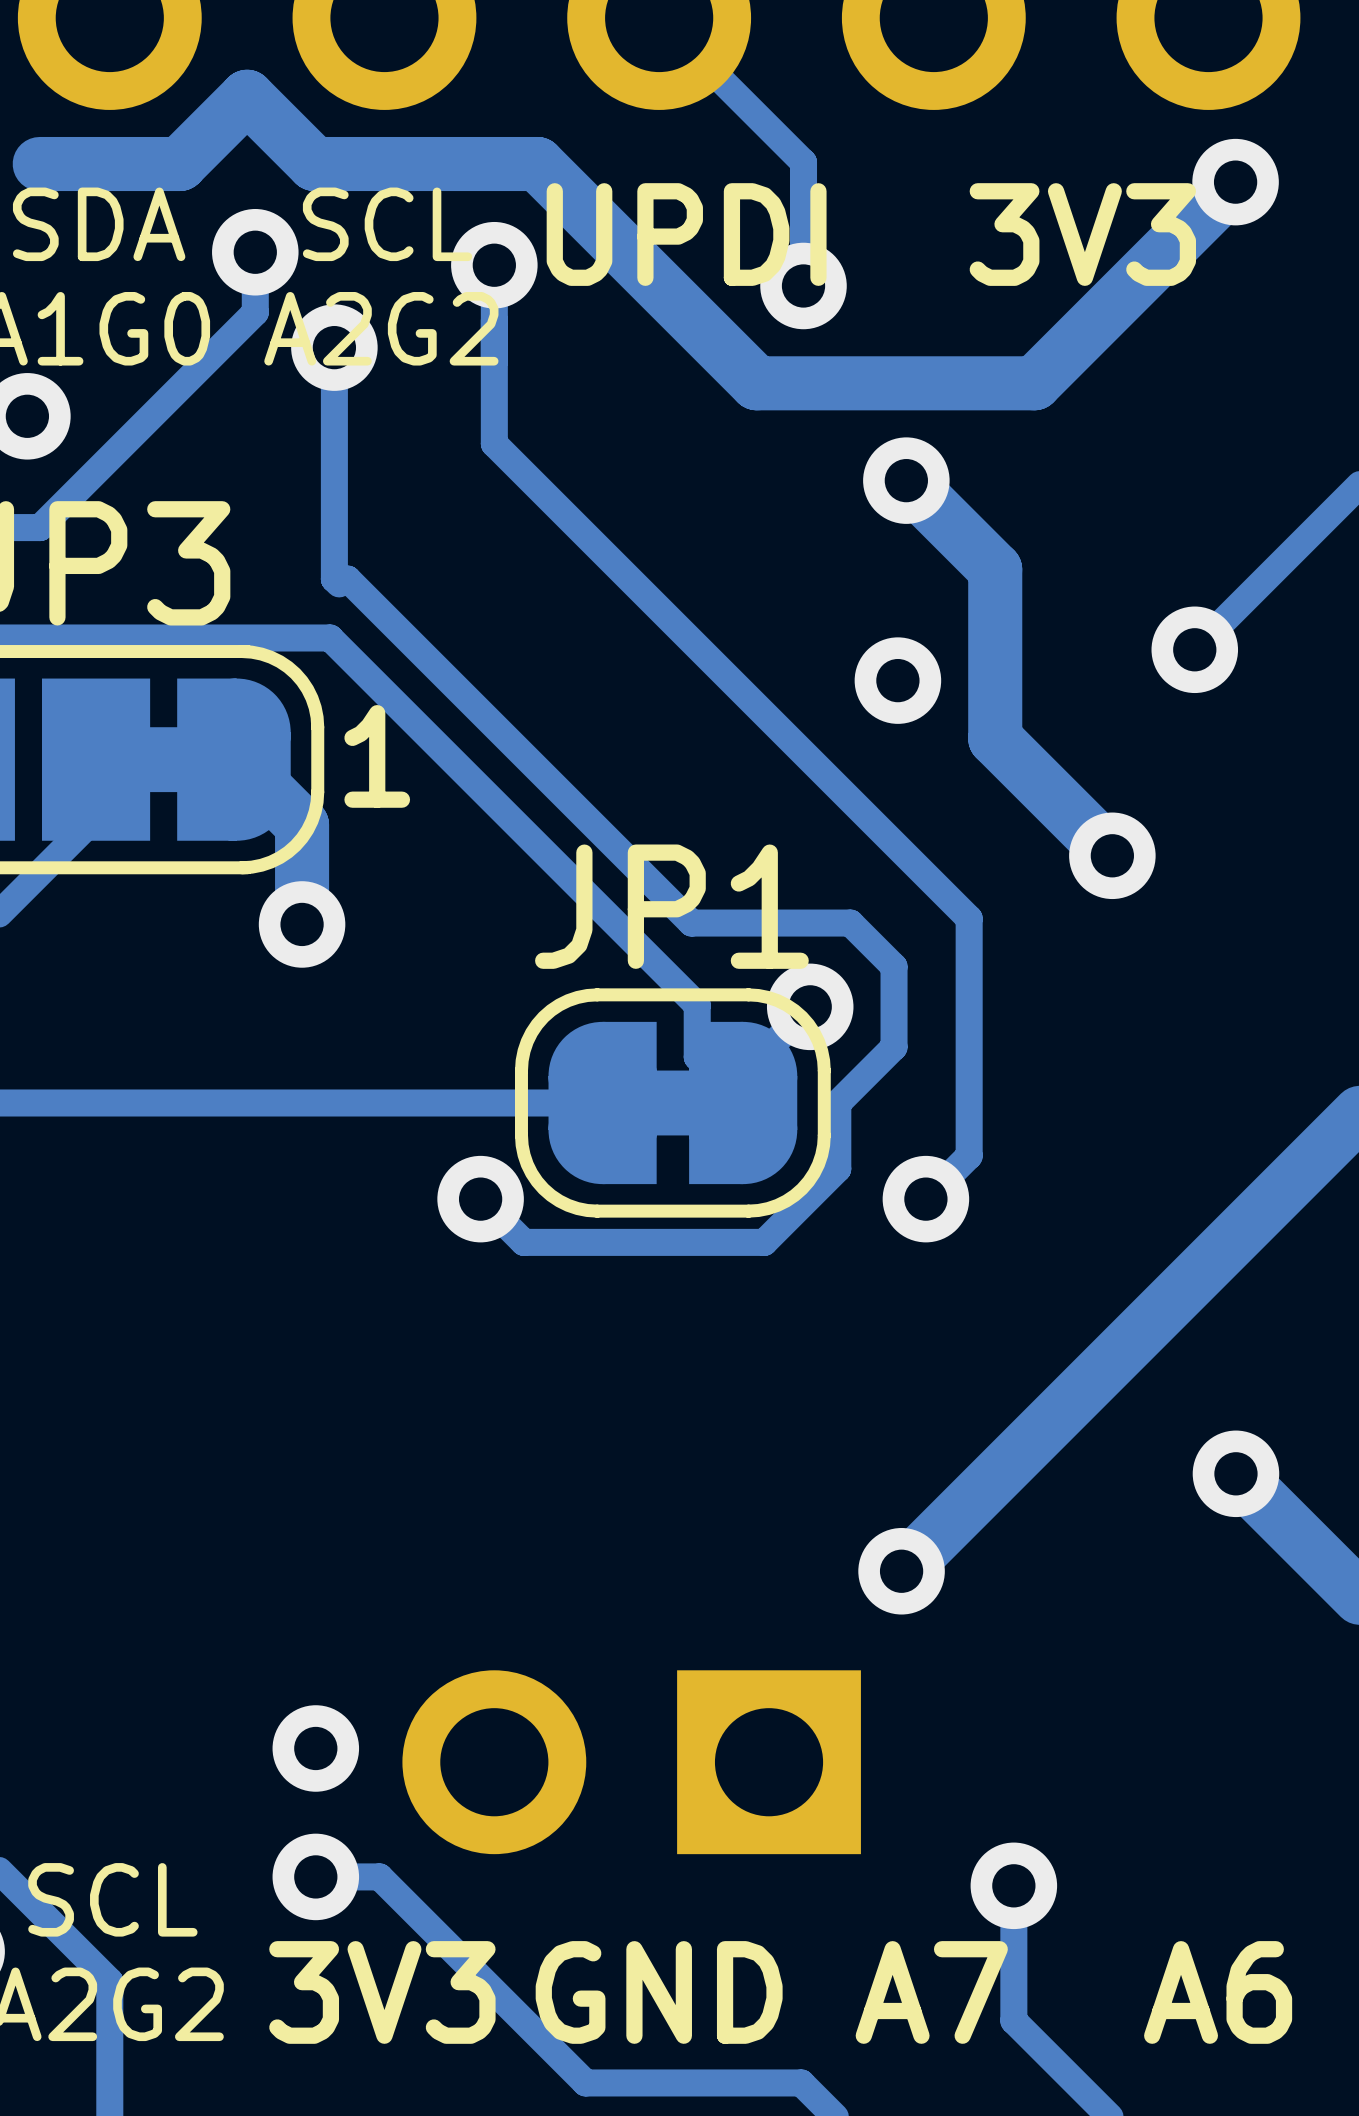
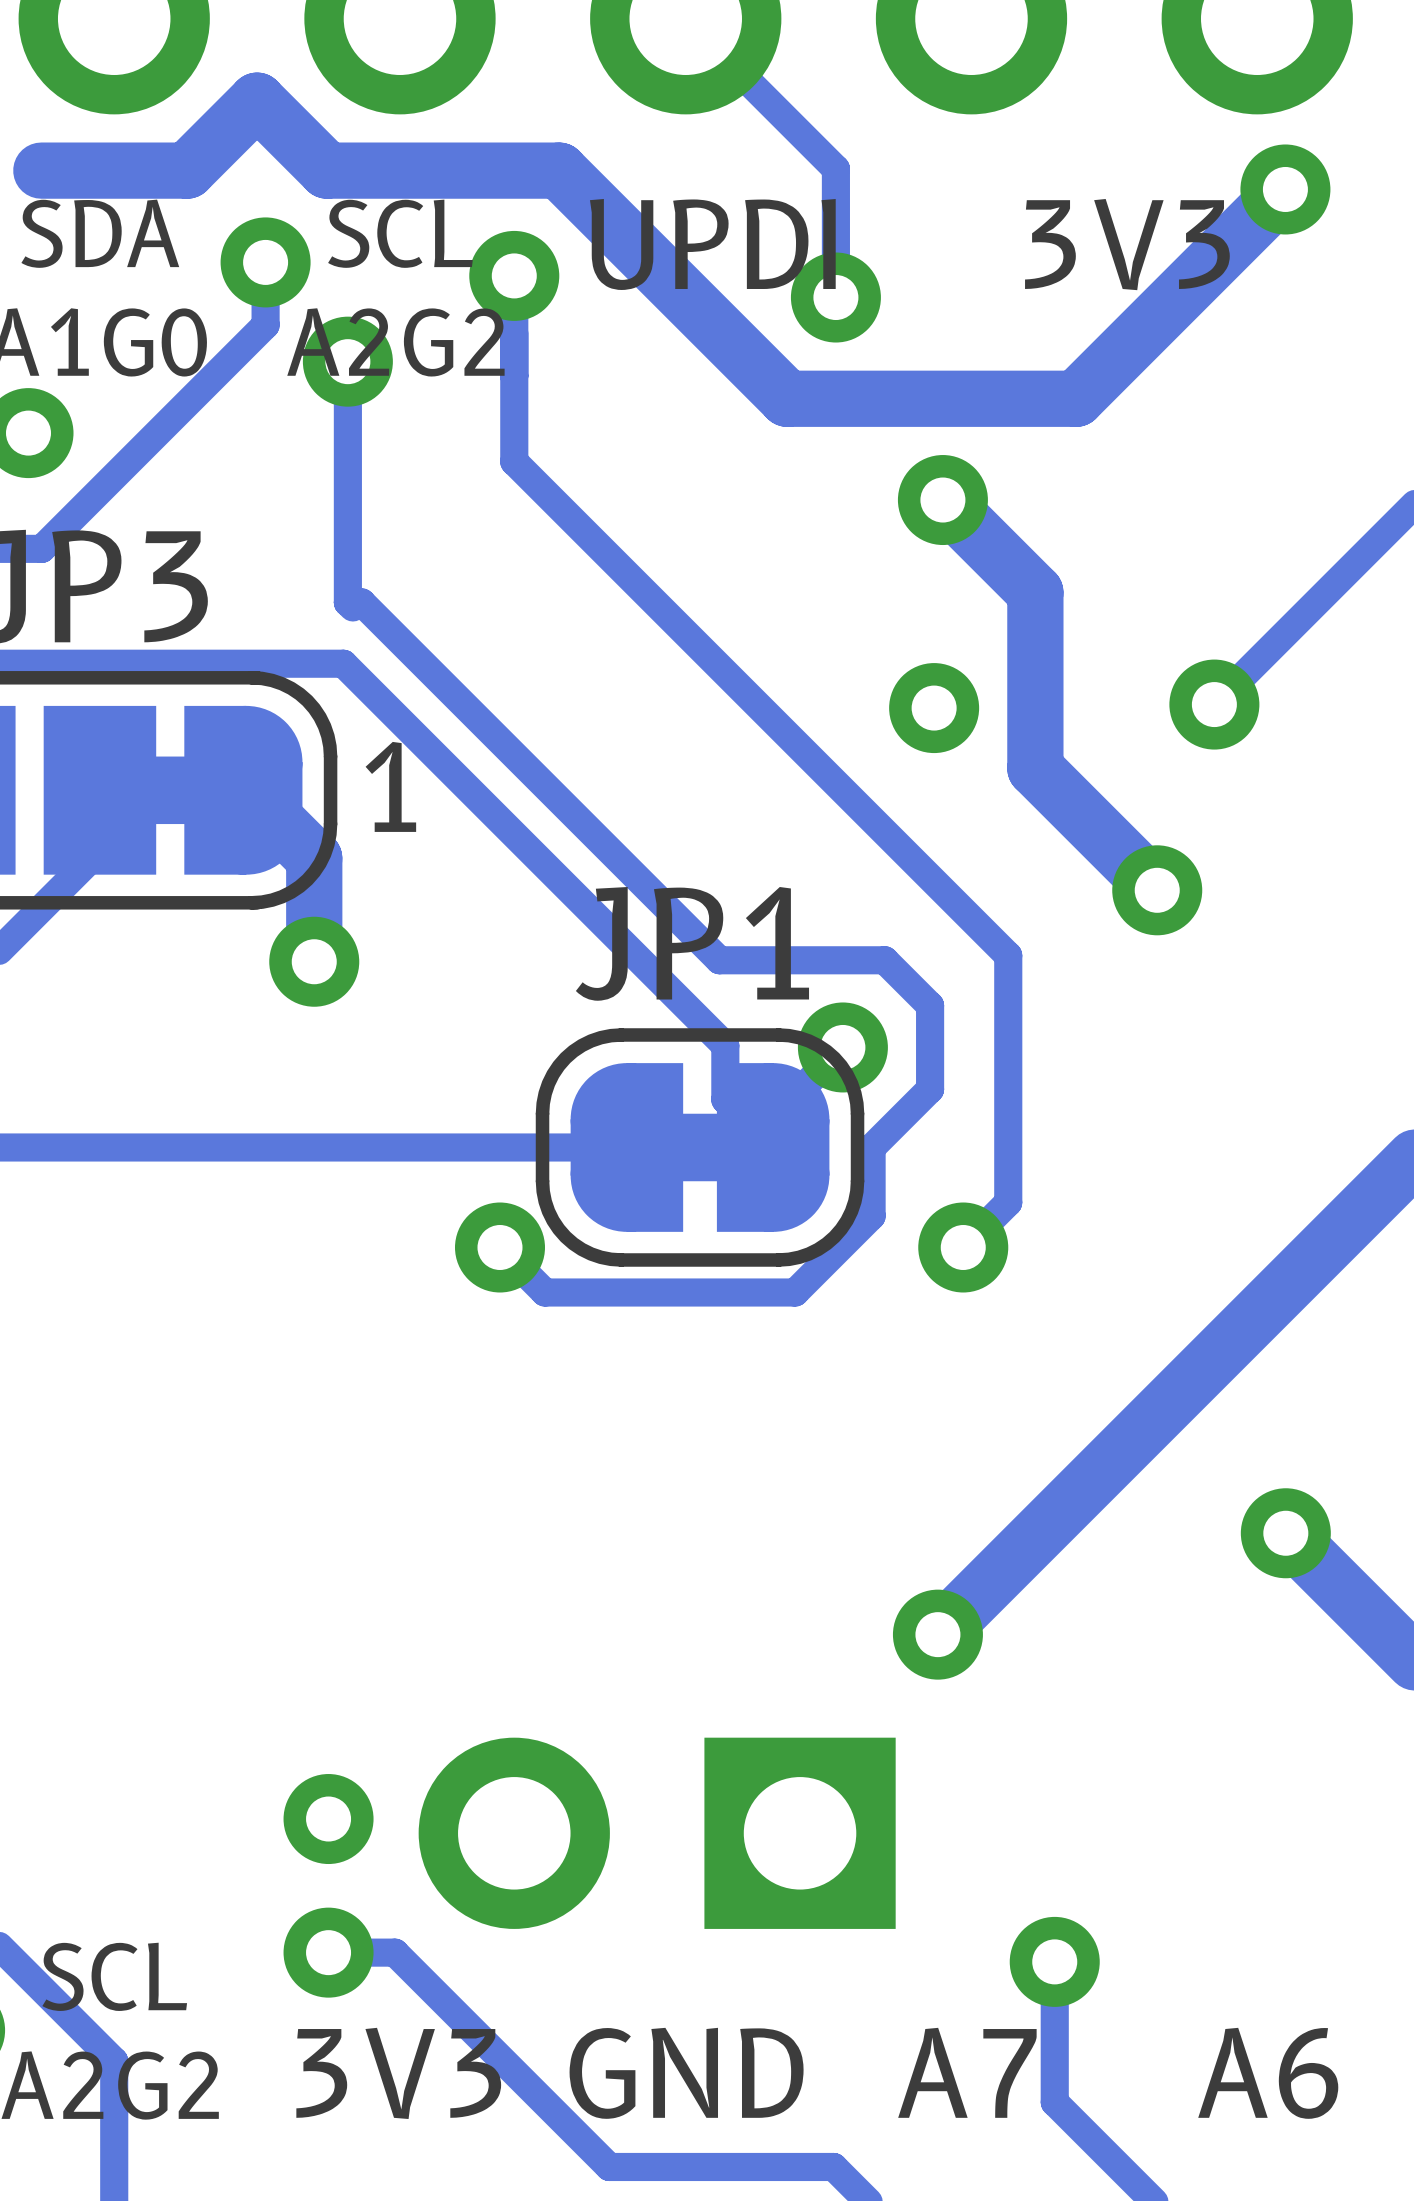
via position: (1194, 649) -> (1214, 704)

